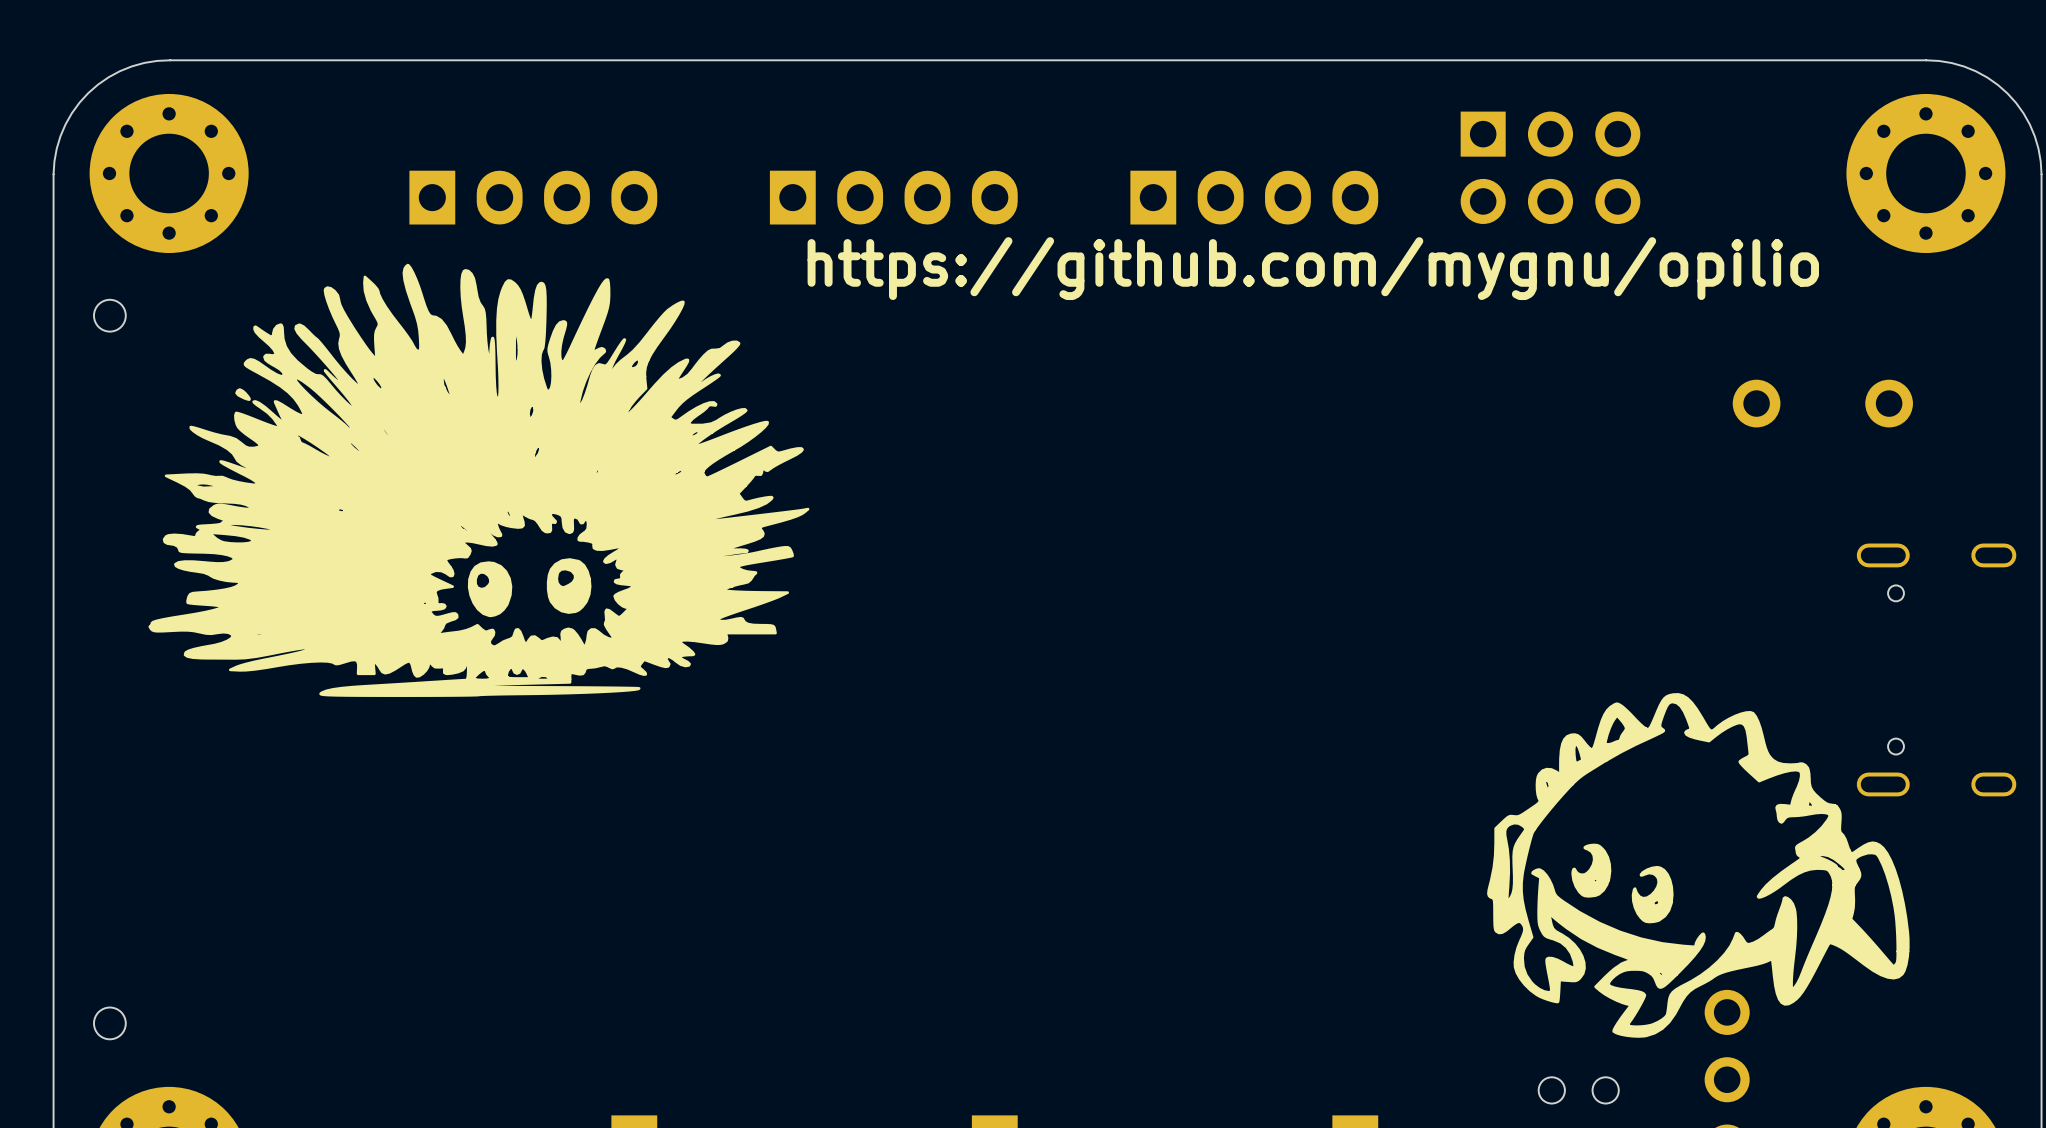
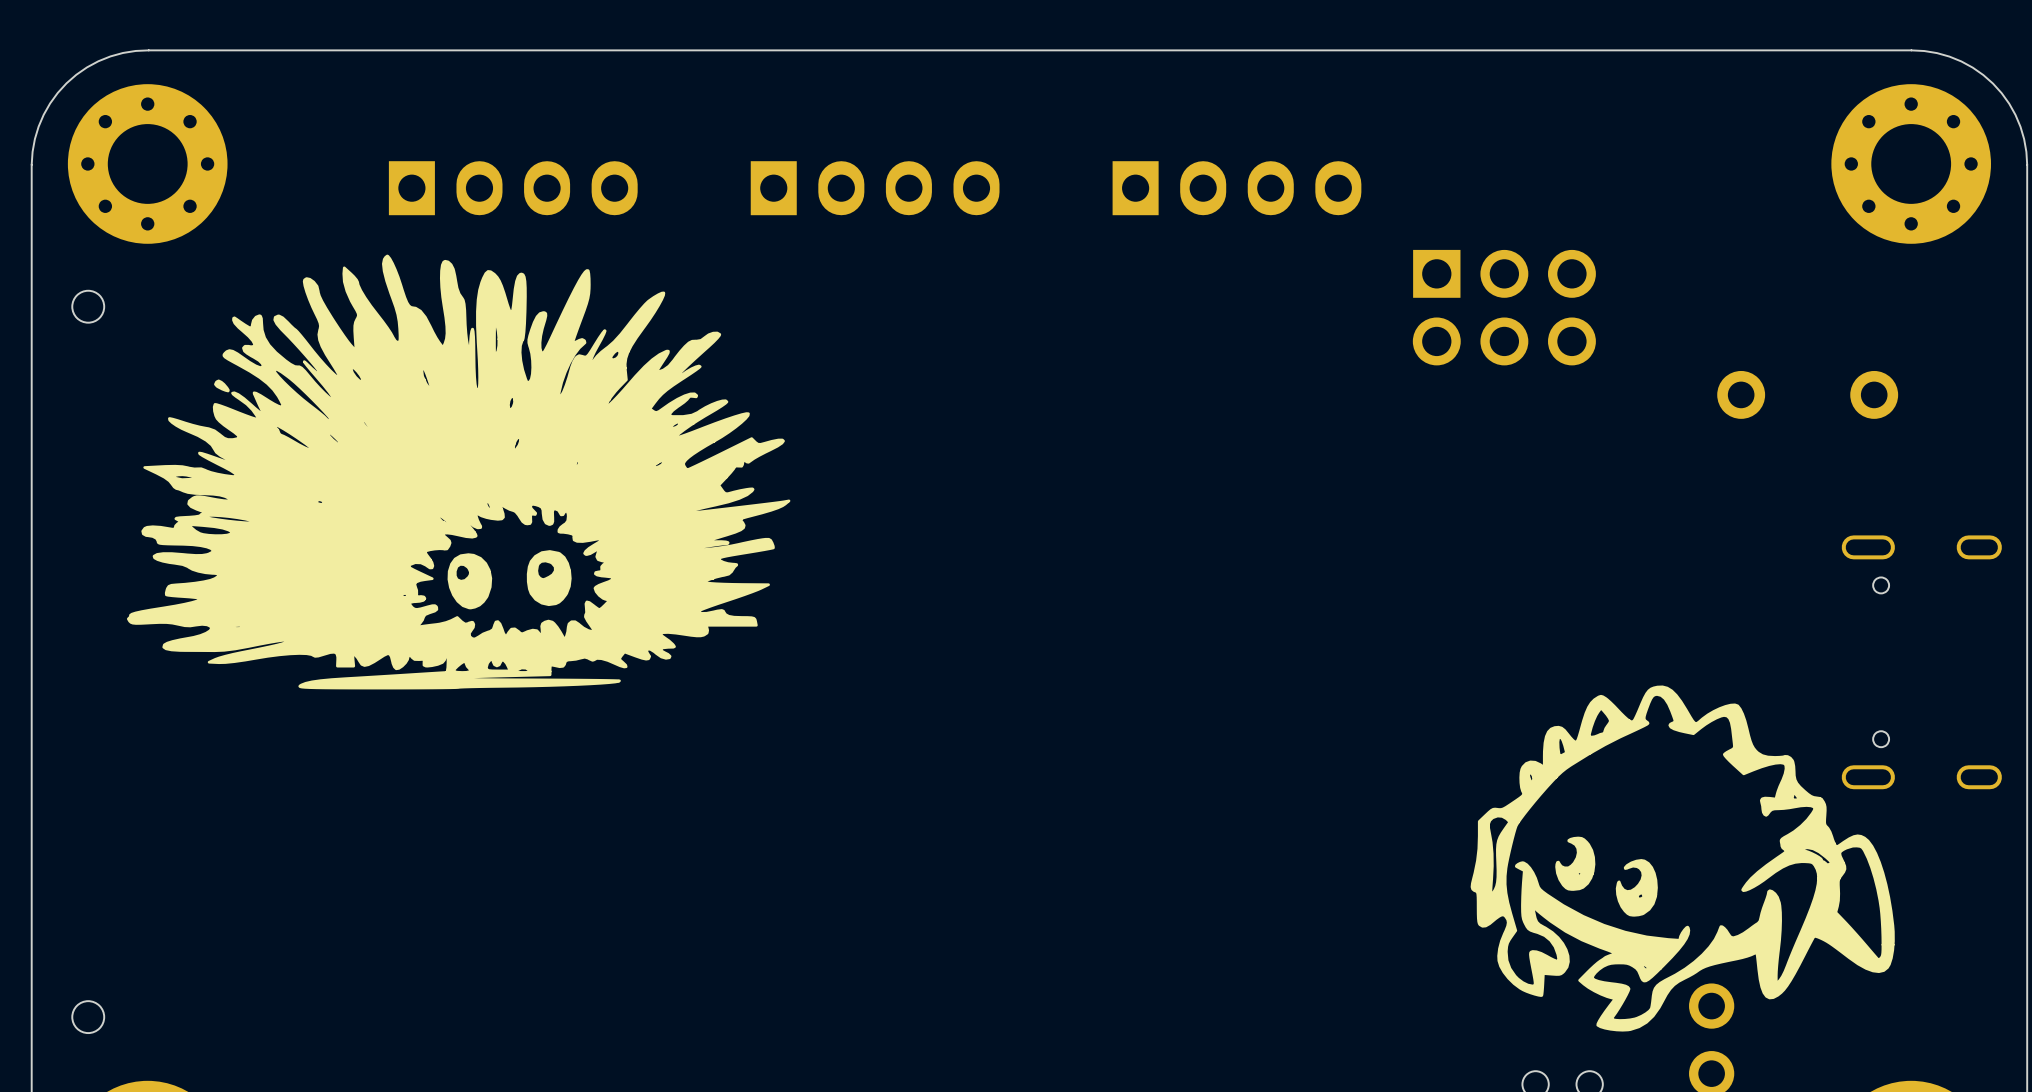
part: (1550, 167) -> none
text: https://github.com/mygnu/opilio (1313, 268) -> none
part: none -> (1504, 307)

